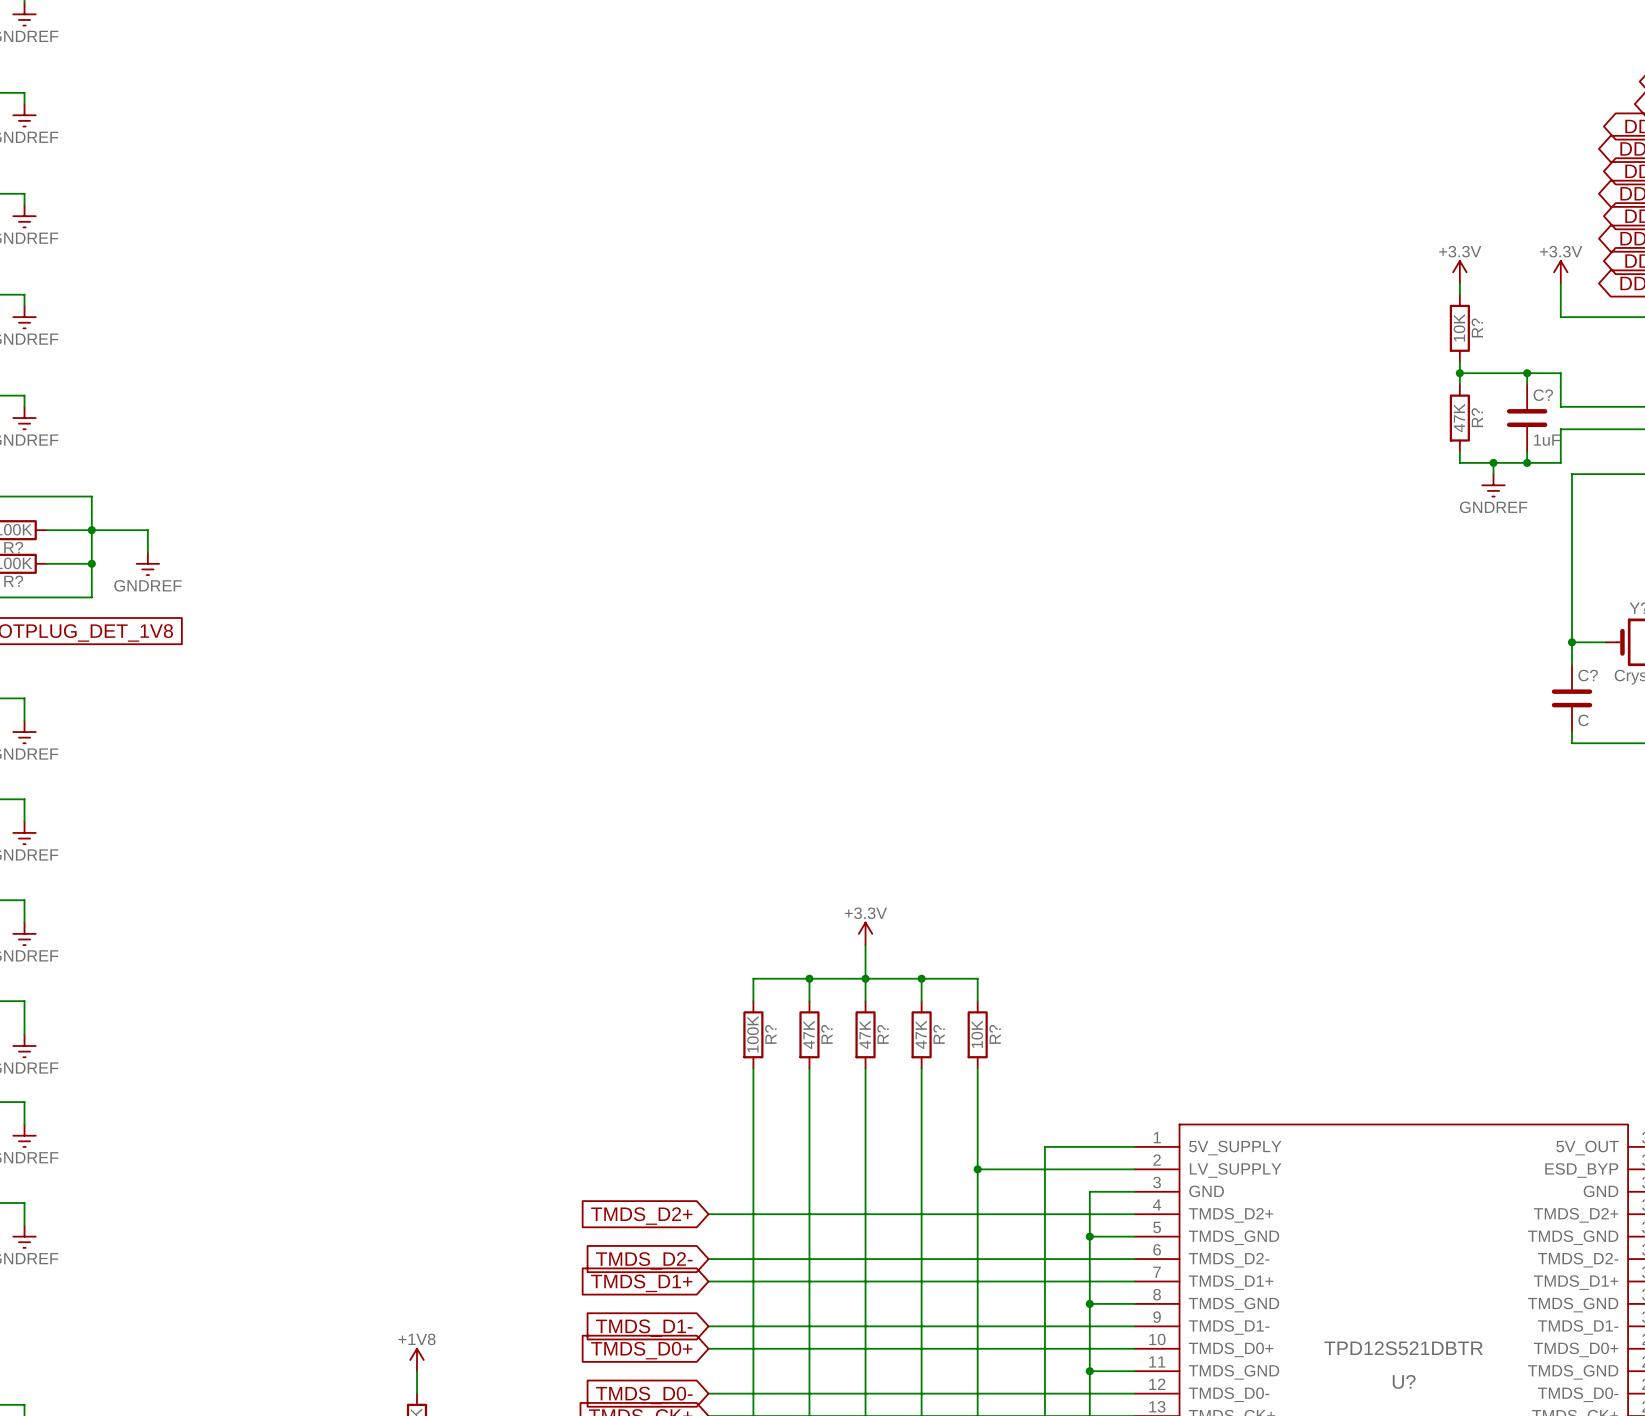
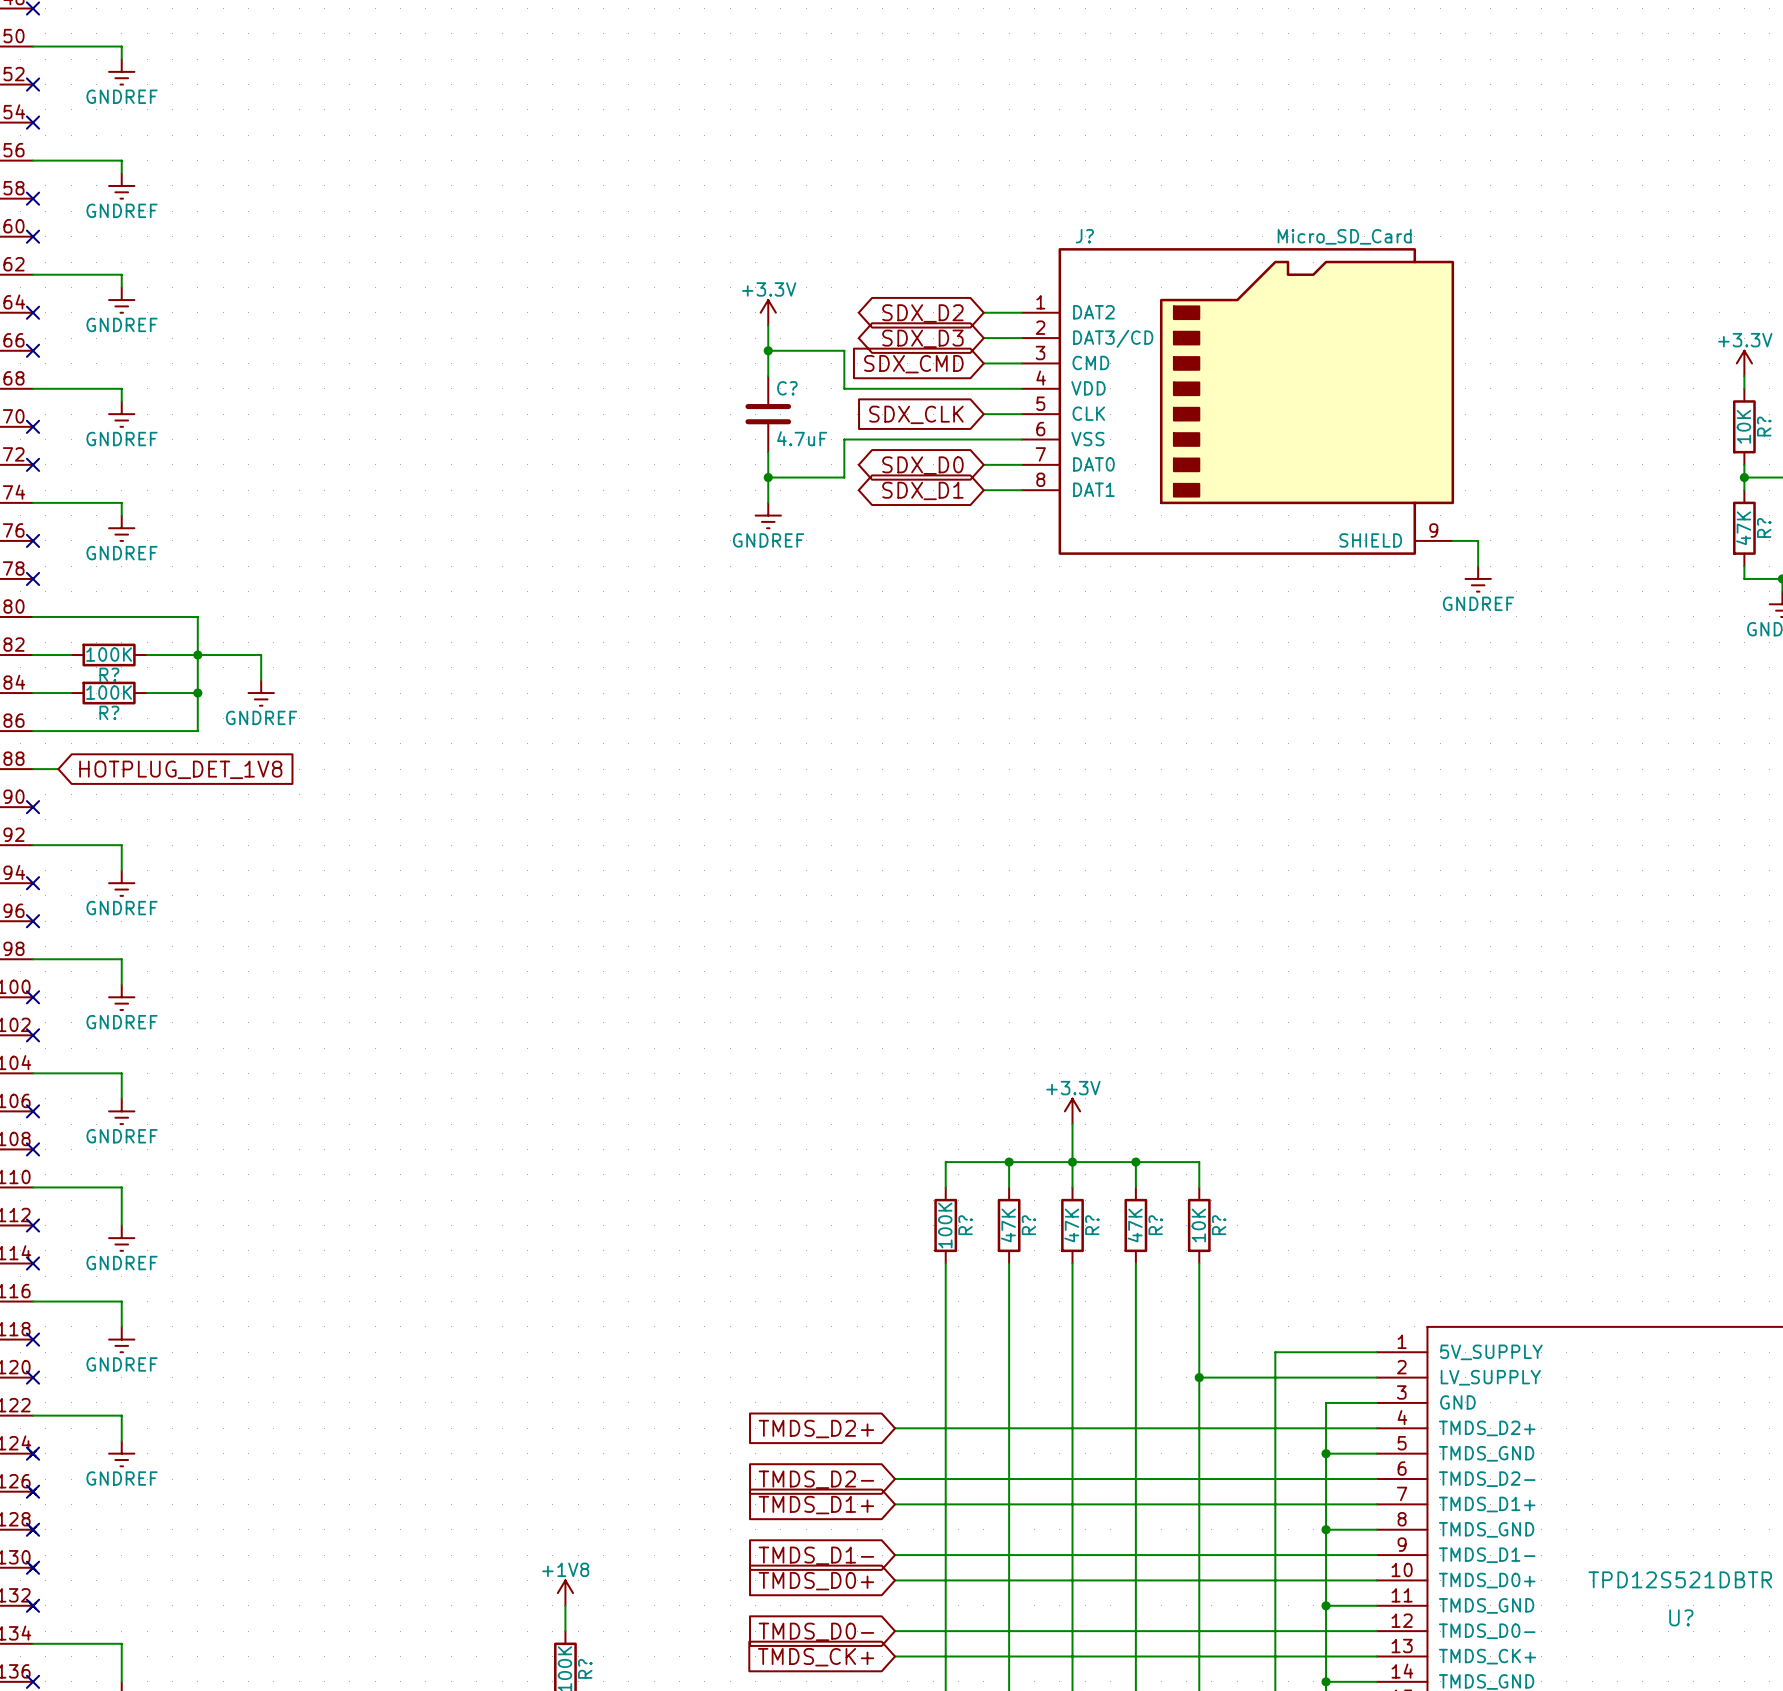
power symbol: none -> +3.3V (768, 312)
wire: none -> (983, 312) (1021, 312)
global label: none -> SDX_D2 (922, 313)
wire: none -> (768, 325) (768, 376)
wire: none -> (983, 338) (1021, 338)
global label: none -> SDX_D3 (922, 338)
wire: none -> (768, 350) (844, 350) (844, 388) (1021, 388)
junction: none -> (768, 350)
wire: none -> (983, 363) (1021, 363)
global label: none -> SDX_CMD (913, 364)
J?: none -> Micro_SD_Card (1237, 401)
C?: none -> 4.7uF (768, 414)
wire: none -> (983, 414) (1021, 414)
global label: none -> SDX_CLK (916, 414)
wire: none -> (1021, 439) (844, 439) (844, 477) (768, 477)
wire: none -> (768, 452) (768, 502)
wire: none -> (983, 464) (1021, 464)
global label: none -> SDX_D0 (922, 465)
junction: none -> (768, 477)
wire: none -> (983, 490) (1021, 490)
global label: none -> SDX_D1 (922, 490)
power symbol: none -> GNDREF (768, 515)
wire: none -> (1452, 540) (1478, 540) (1478, 566)
power symbol: none -> GNDREF (1478, 578)

